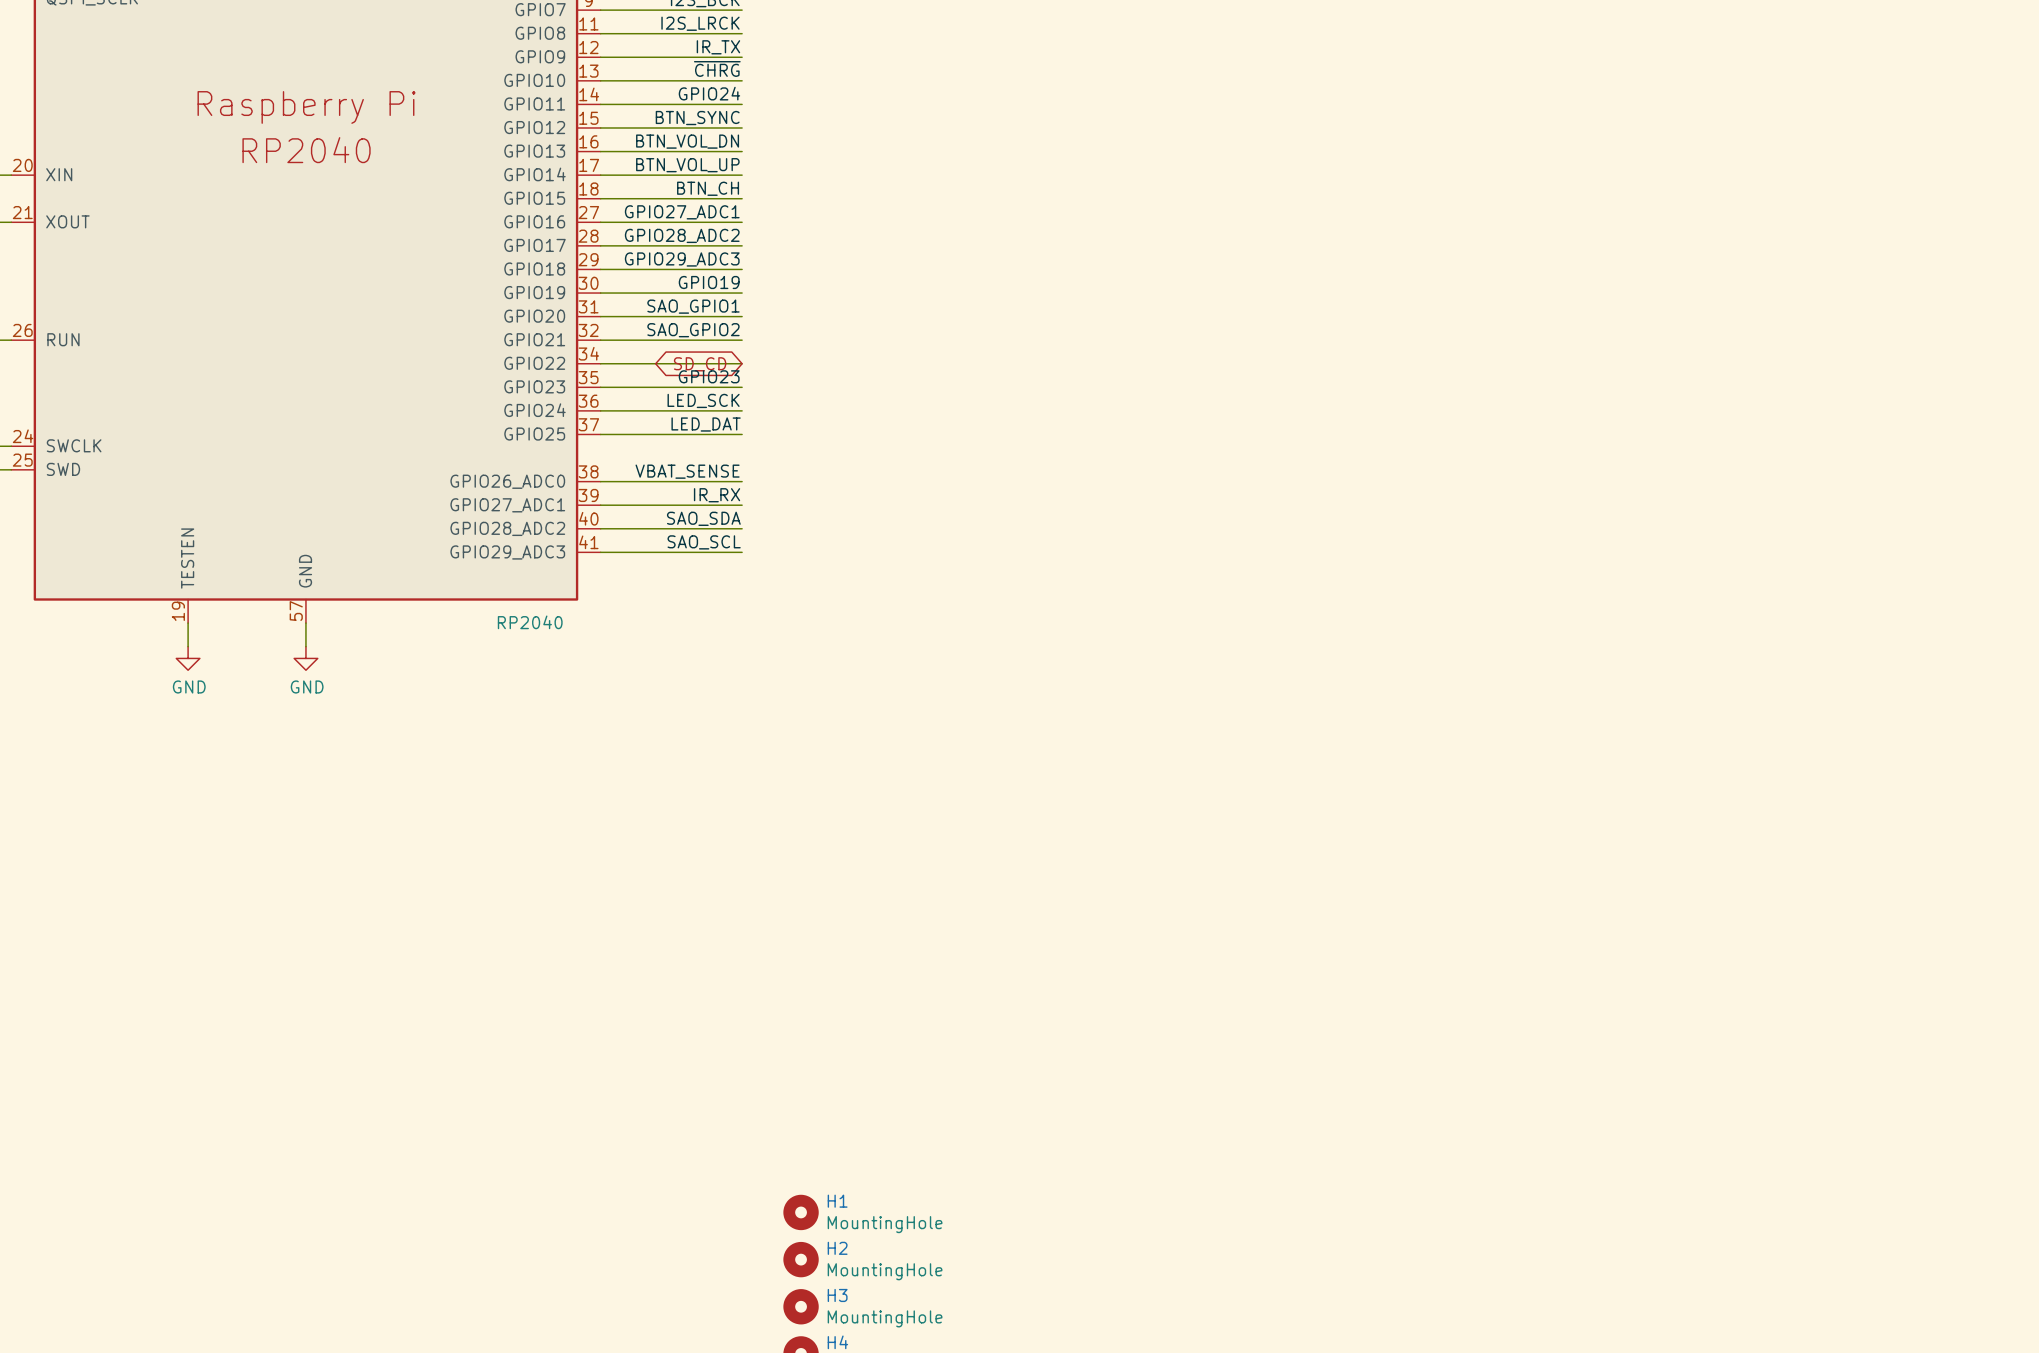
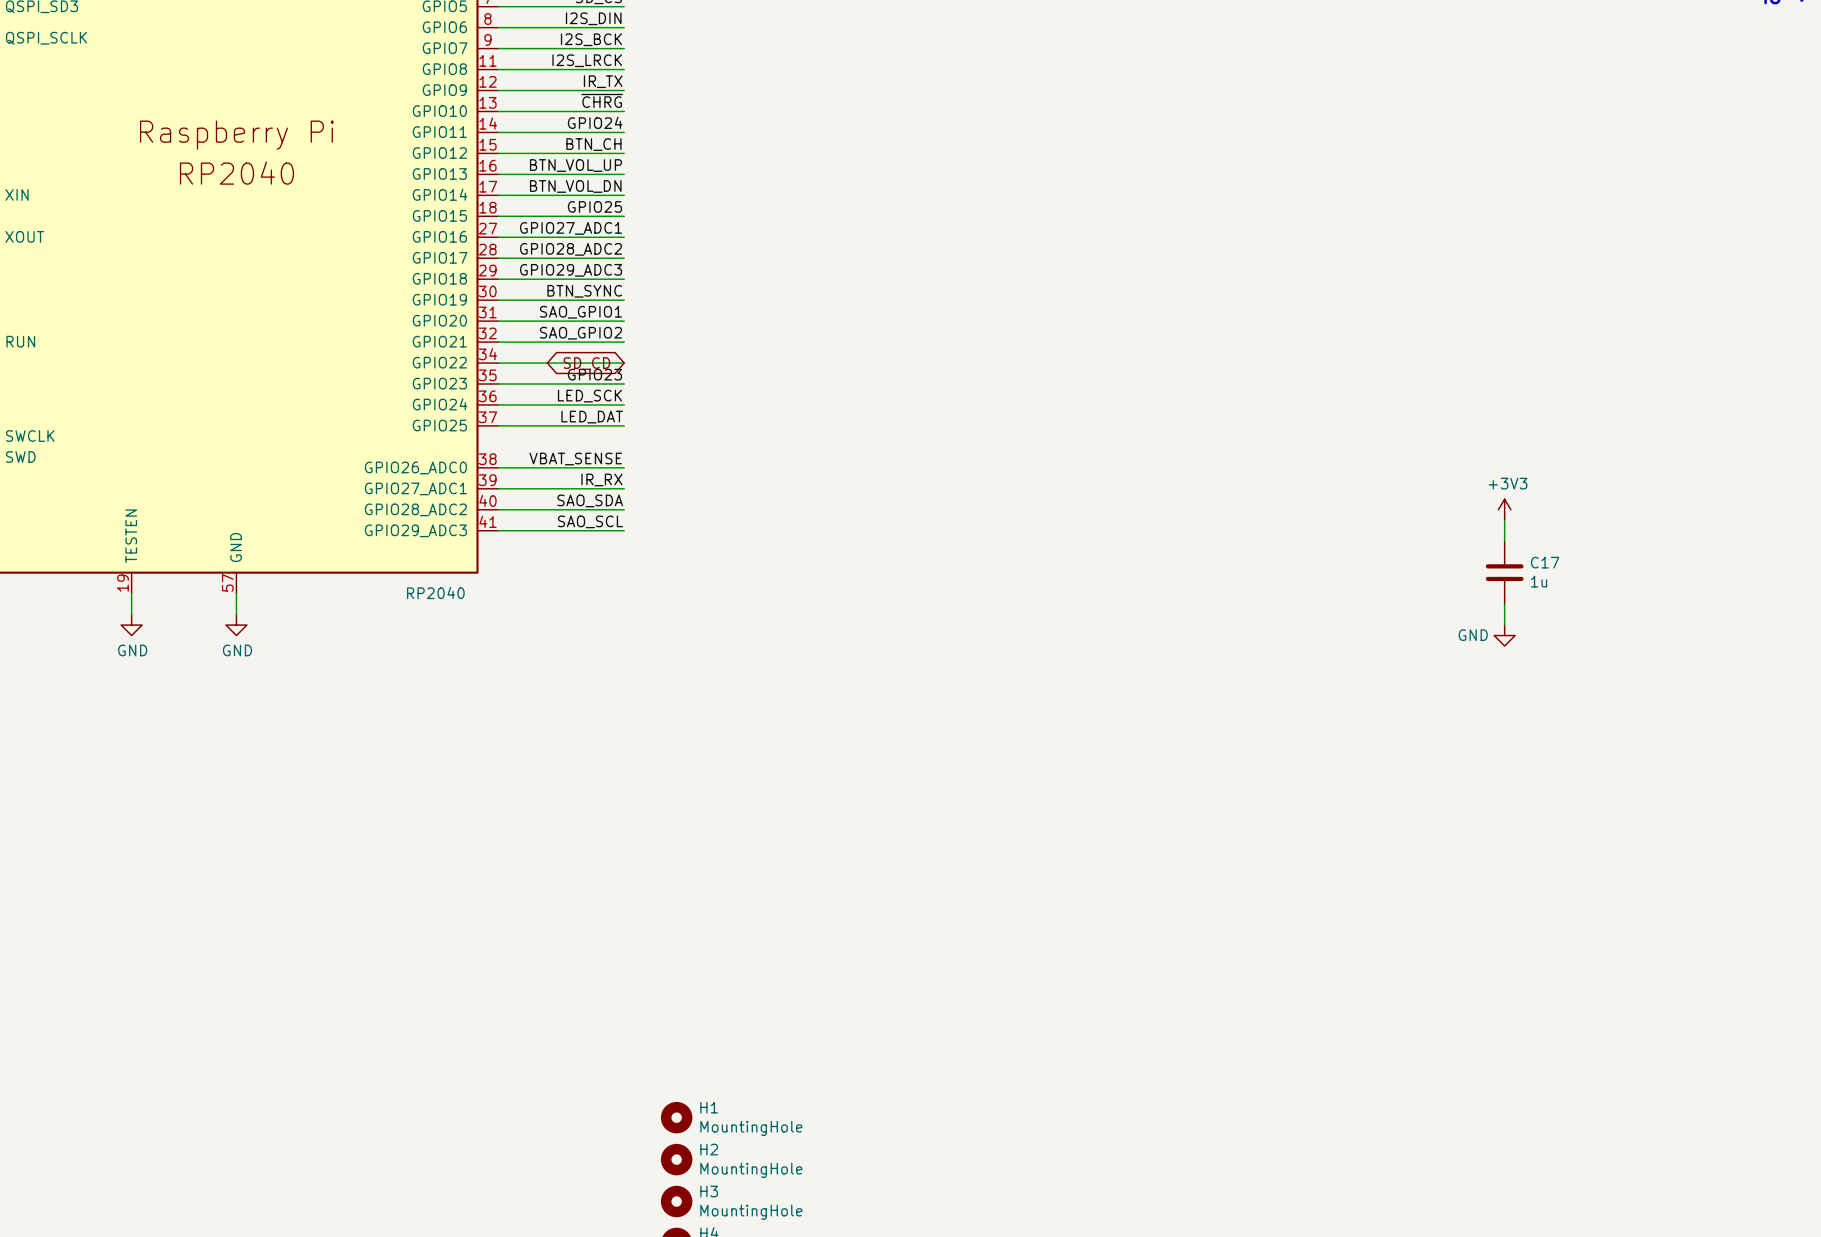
label: BTN_SYNC (697, 118) -> BTN_CH (593, 144)
label: BTN_VOL_DN (687, 141) -> BTN_VOL_UP (575, 165)
label: BTN_VOL_UP (687, 165) -> BTN_VOL_DN (575, 186)
label: BTN_CH (708, 188) -> GPIO25 (594, 206)
label: GPIO19 (709, 282) -> BTN_SYNC (584, 291)
power symbol: none -> +3V3 (1504, 509)
wire: none -> (1504, 520) (1504, 541)
C17: none -> 1u (1504, 572)
wire: none -> (1504, 604) (1504, 625)
power symbol: none -> GND (1504, 635)

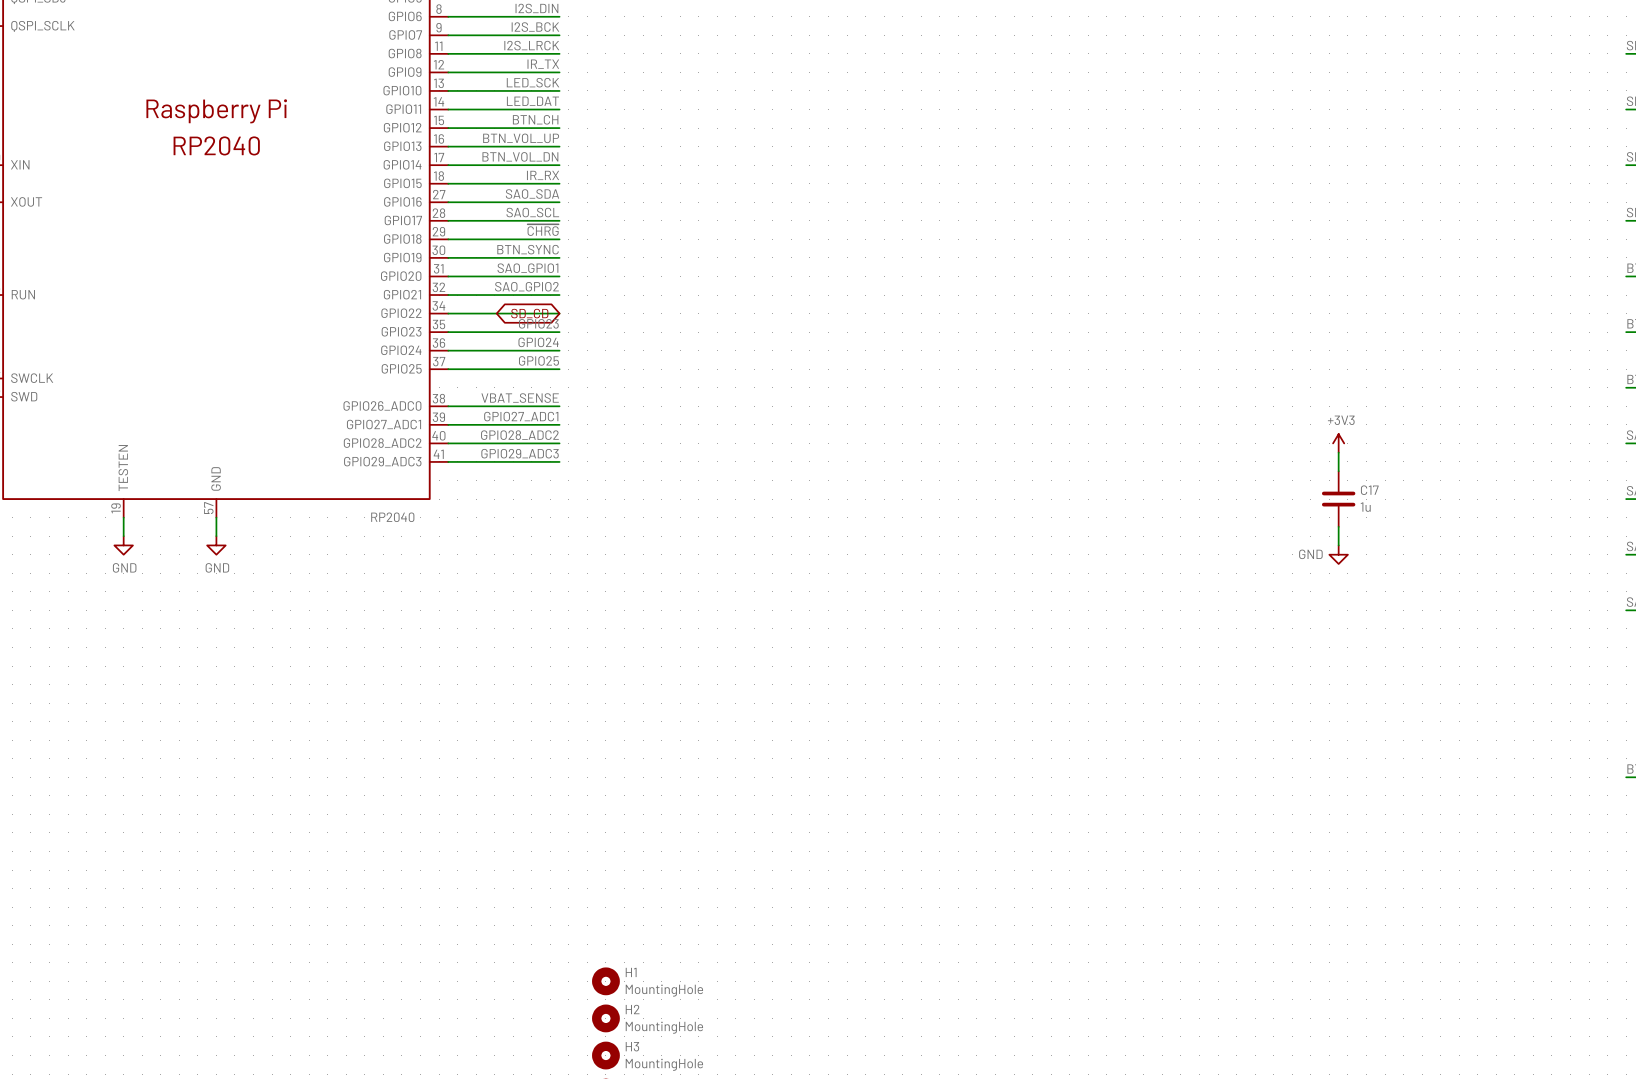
label: ~{CHRG} (602, 100) -> LED_SCK (533, 82)
label: GPIO24 (595, 122) -> LED_DAT (532, 101)
label: GPIO25 (594, 206) -> IR_RX (543, 175)
label: GPIO27_ADC1 (571, 228) -> SAO_SDA (532, 193)
label: GPIO28_ADC2 (571, 249) -> SAO_SCL (532, 212)
label: GPIO29_ADC3 (571, 270) -> ~{CHRG} (543, 230)
label: LED_SCK (589, 396) -> GPIO24 (538, 342)
label: LED_DAT (592, 417) -> GPIO25 (538, 360)
label: IR_RX (601, 479) -> GPIO27_ADC1 (521, 416)
label: SAO_SDA (590, 500) -> GPIO28_ADC2 (519, 435)
label: SAO_SCL (590, 521) -> GPIO29_ADC3 (520, 453)

